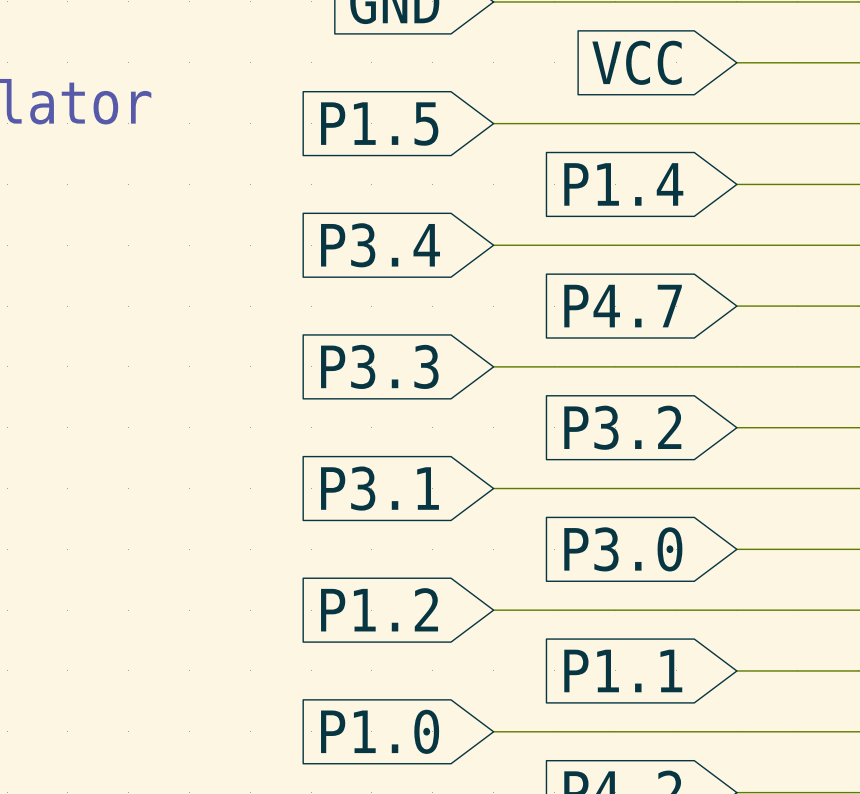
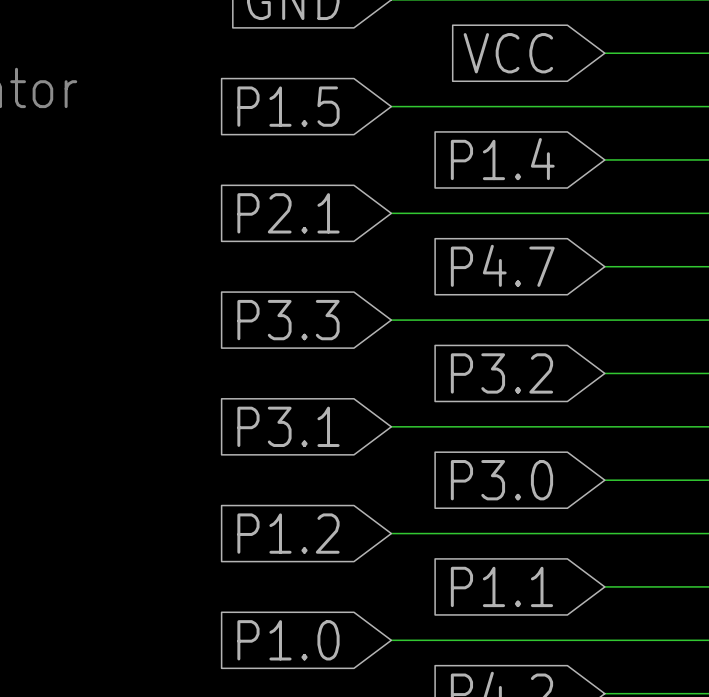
global label: P3.4 (380, 245) -> P2.1 (288, 213)

